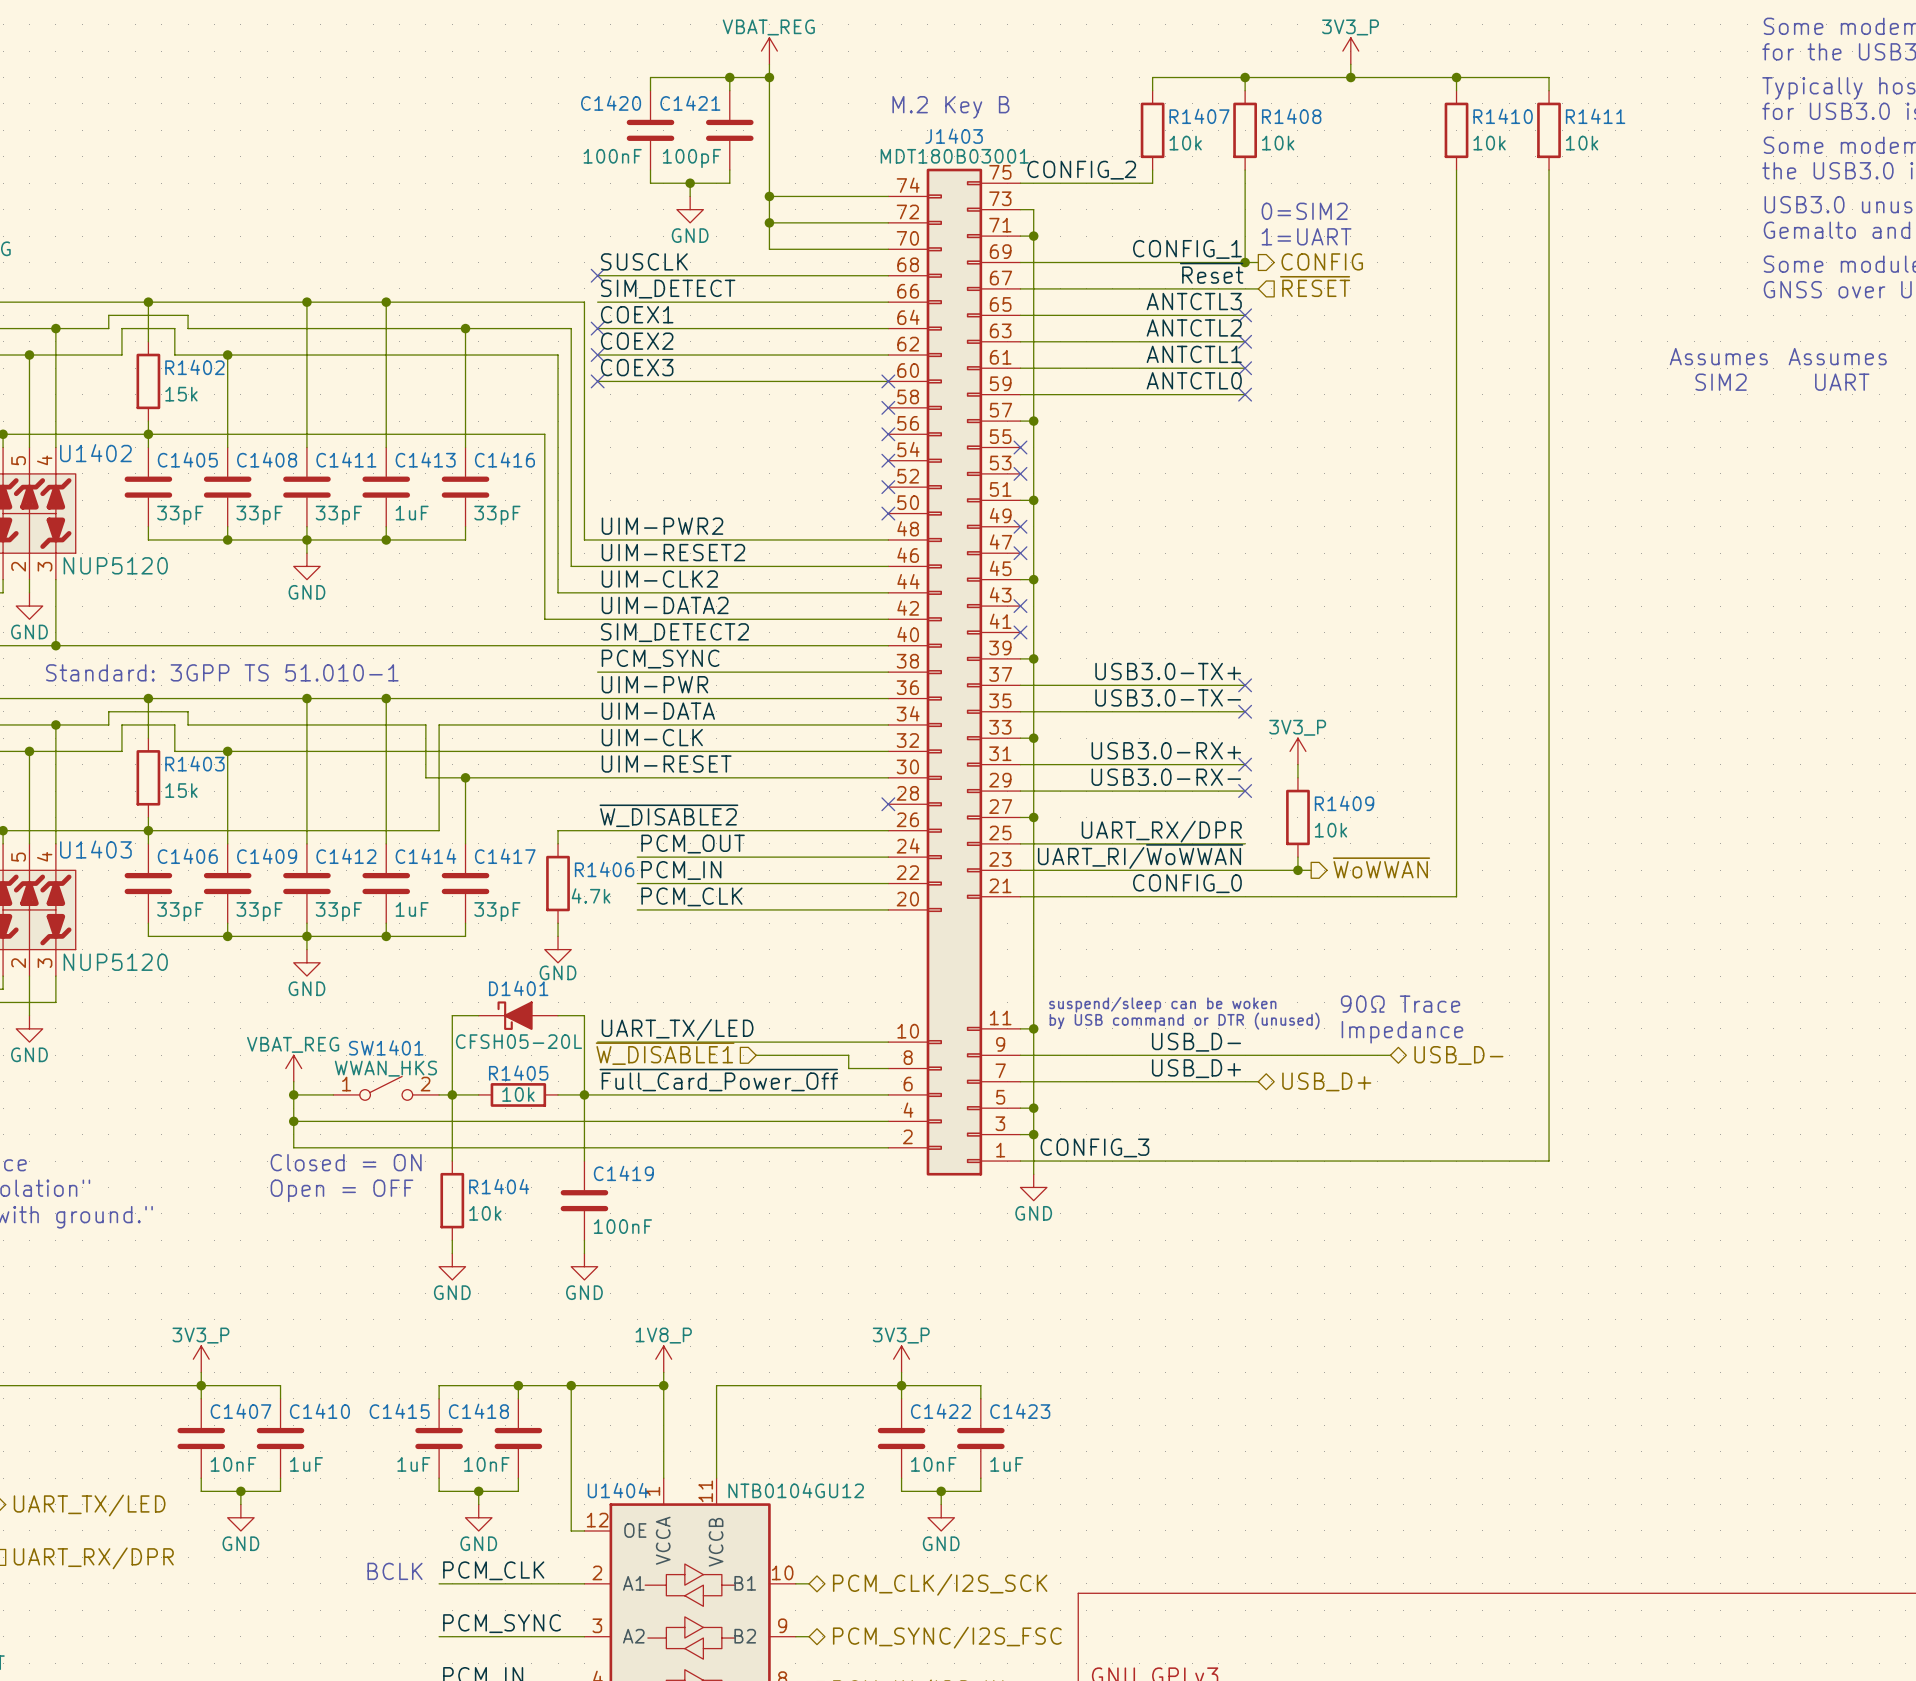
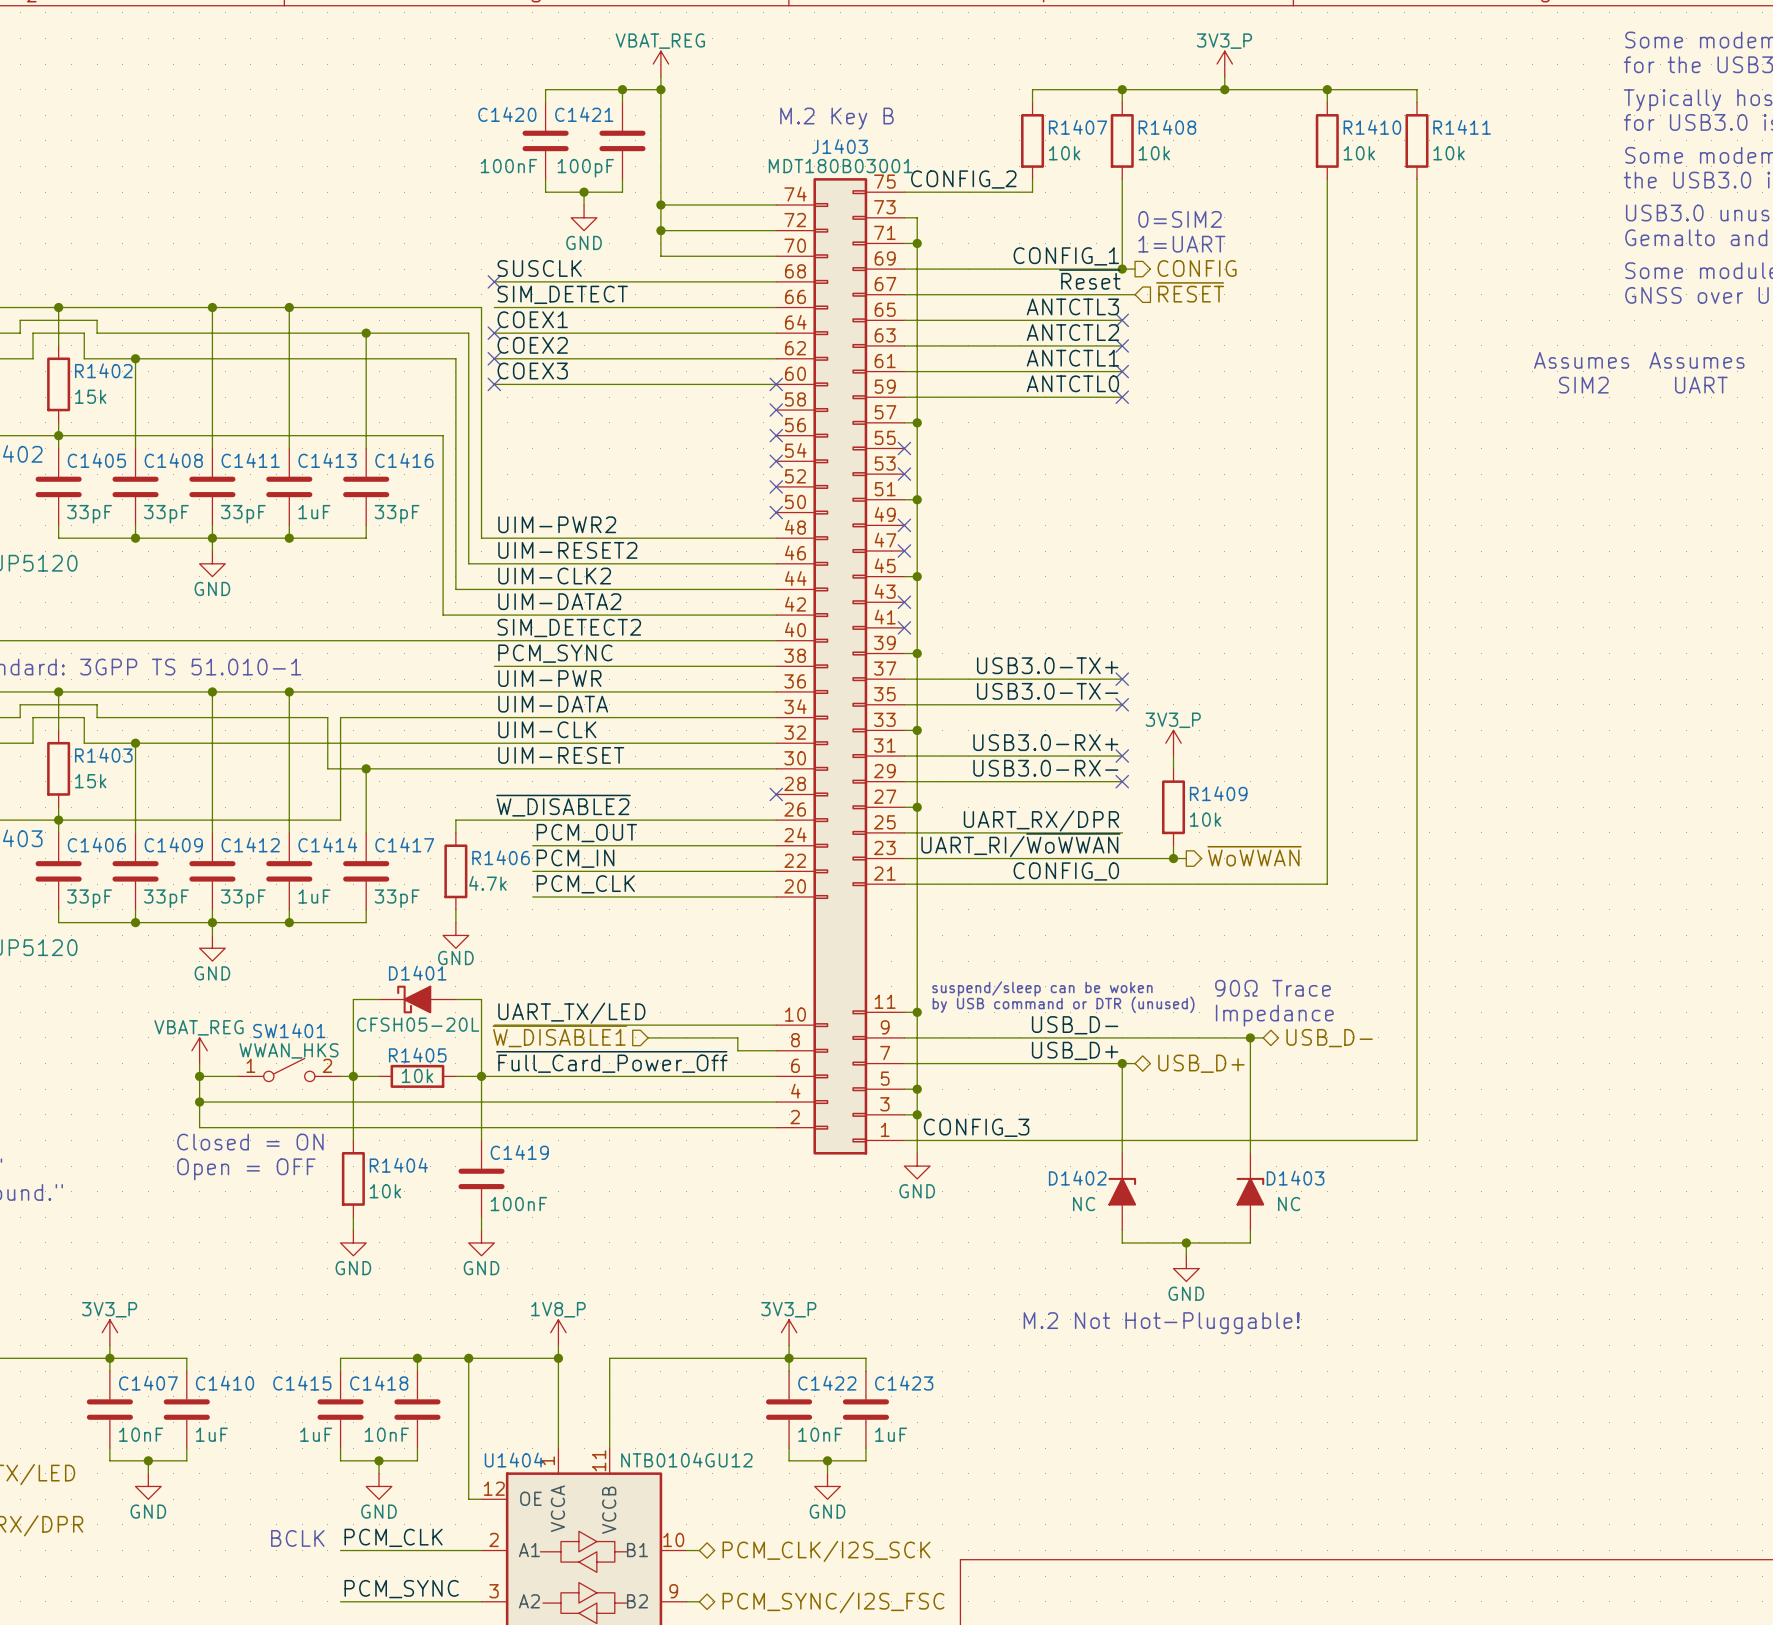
wire: none -> (1250, 1037) (1250, 1153)
junction: none -> (1250, 1037)
wire: none -> (1122, 1063) (1122, 1153)
junction: none -> (1122, 1063)
D1402: none -> NC (1122, 1191)
D1403: none -> NC (1250, 1191)
wire: none -> (1122, 1230) (1122, 1242) (1250, 1242) (1250, 1230)
wire: none -> (1186, 1242) (1186, 1255)
junction: none -> (1186, 1242)
power symbol: none -> GND (1186, 1268)
text: none -> M.2 Not Hot-Pluggable! (1161, 1323)

